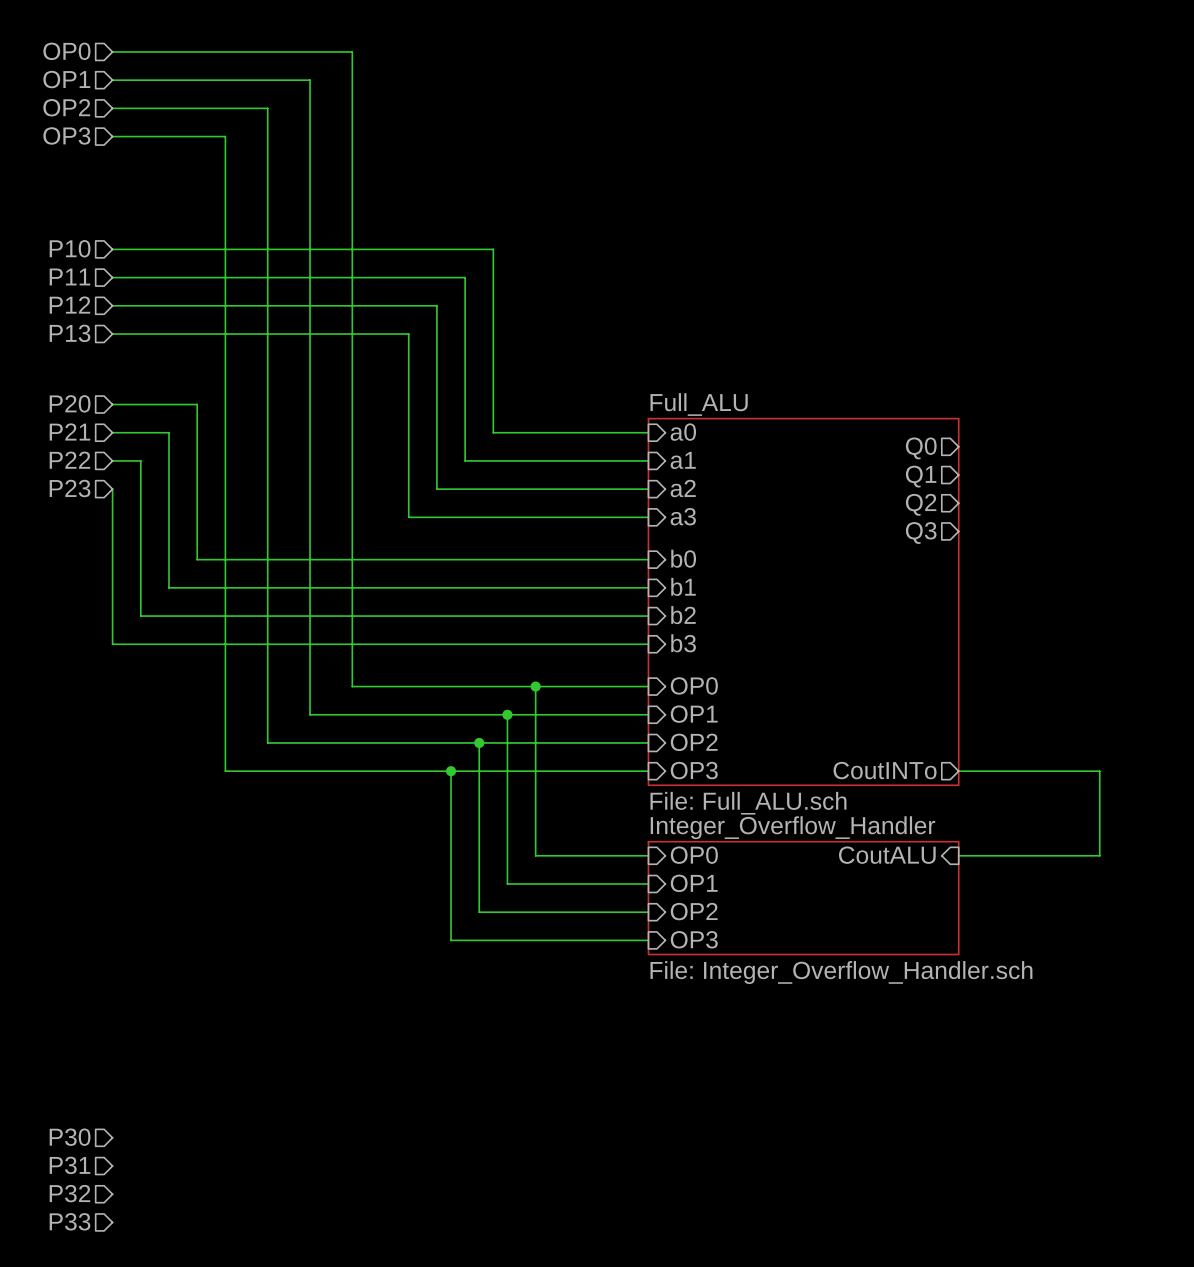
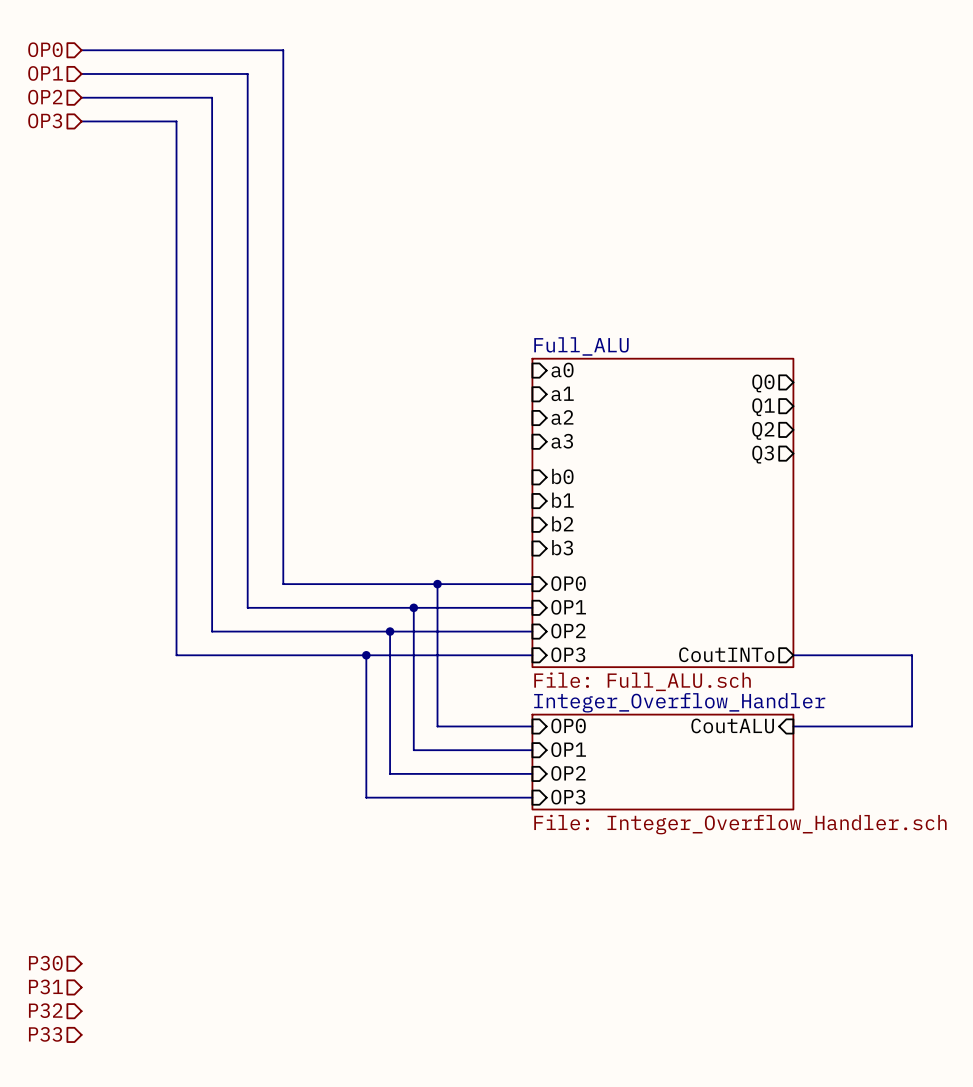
hierarchical label: P10 (70, 248) -> none
wire: (112, 249) (493, 249) (493, 432) (648, 432) -> none
hierarchical label: P11 (69, 276) -> none
wire: (112, 277) (465, 277) (465, 460) (648, 460) -> none
hierarchical label: P12 (69, 305) -> none
wire: (112, 305) (436, 305) (436, 489) (648, 489) -> none
hierarchical label: P13 (70, 333) -> none
wire: (112, 334) (408, 334) (408, 517) (648, 517) -> none
hierarchical label: P20 (70, 403) -> none
wire: (112, 404) (197, 404) (197, 559) (648, 559) -> none
hierarchical label: P21 (69, 431) -> none
wire: (112, 432) (169, 432) (169, 587) (648, 587) -> none
hierarchical label: P22 (69, 460) -> none
wire: (112, 460) (140, 460) (140, 616) (648, 616) -> none
hierarchical label: P23 (70, 488) -> none
wire: (112, 489) (112, 644) (648, 644) -> none

